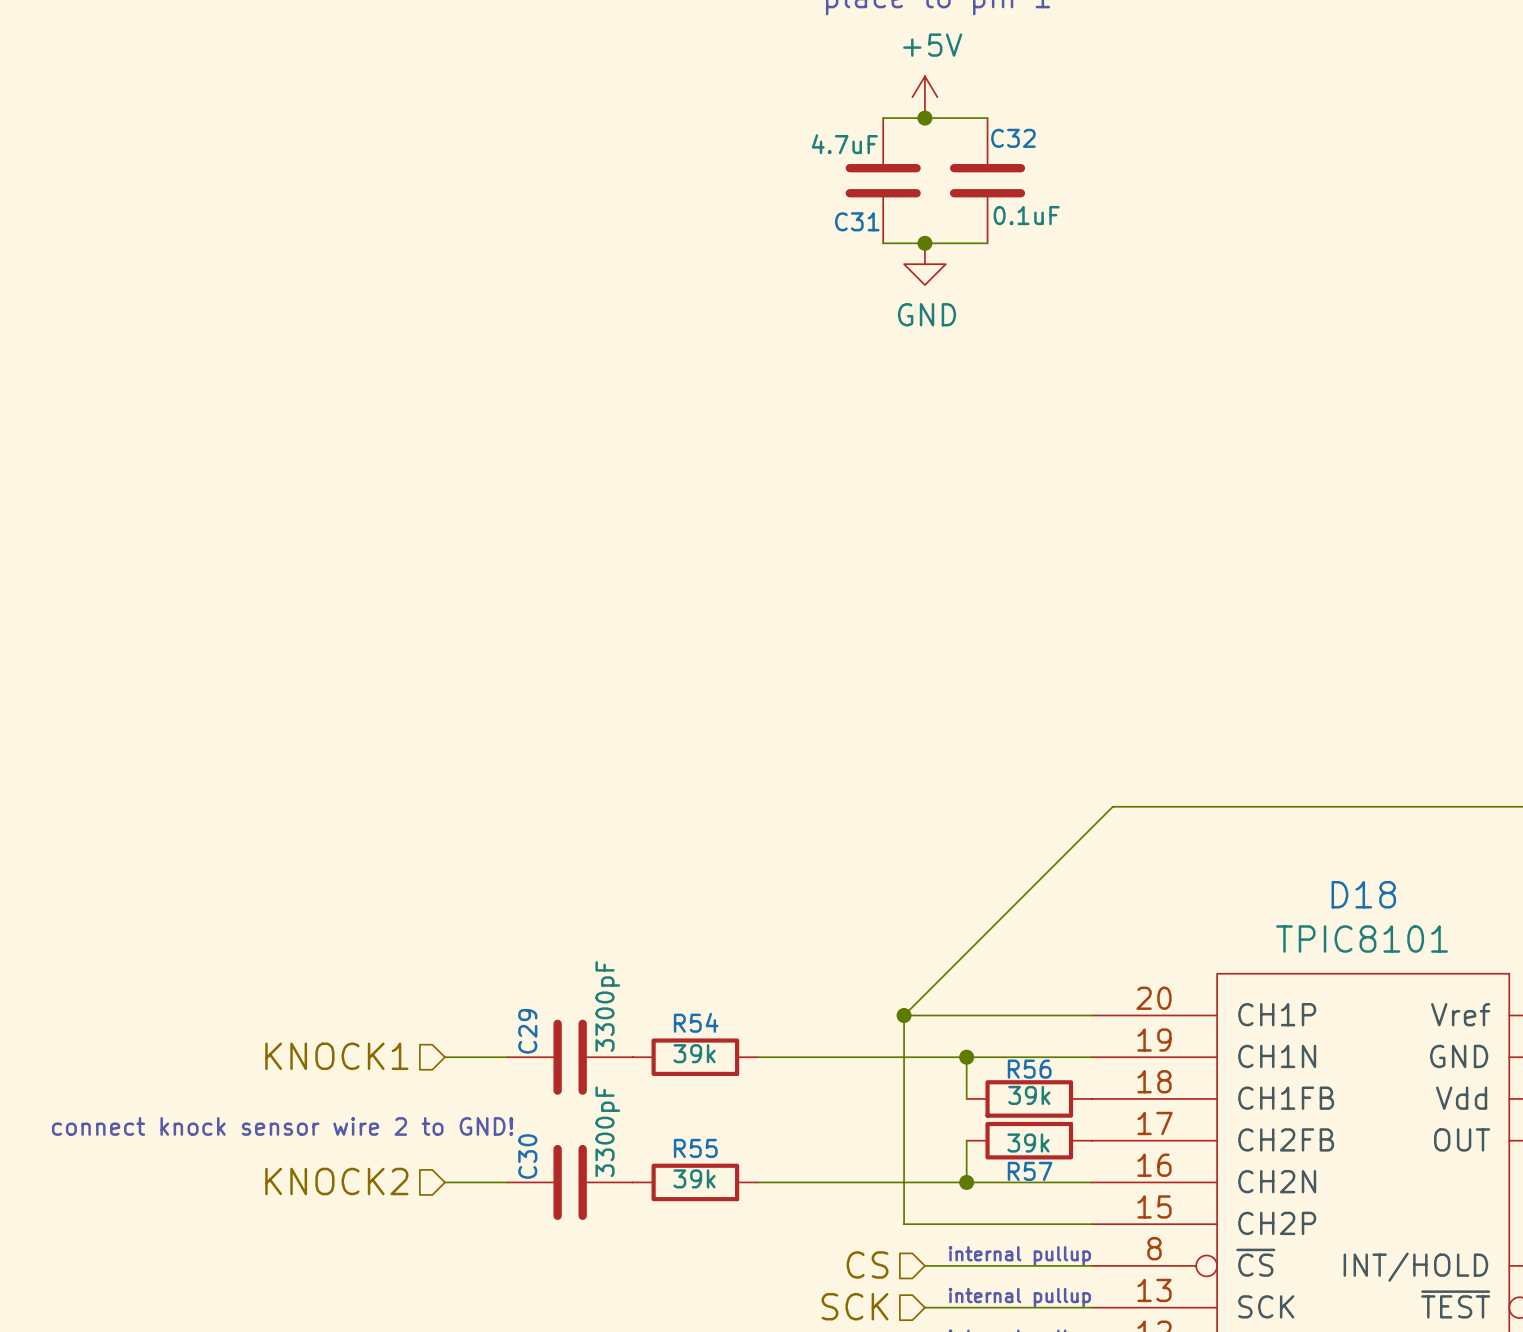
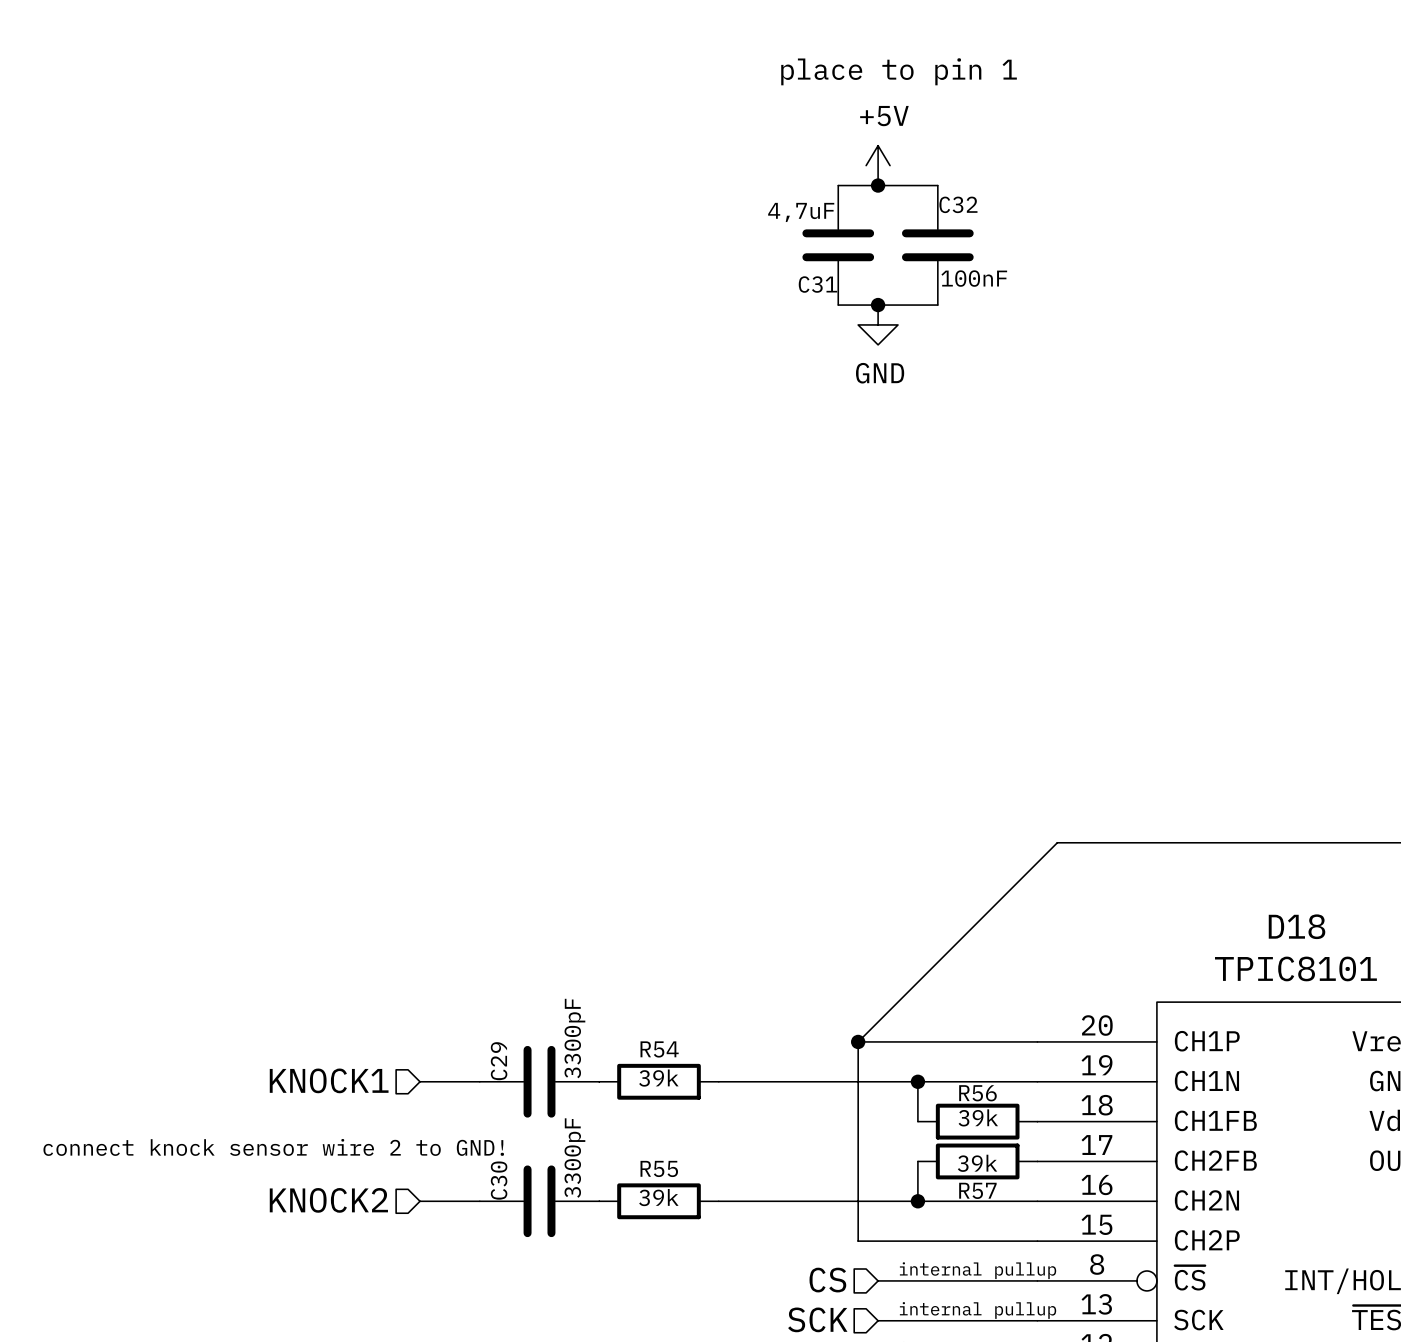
C31 value: 4.7uF (844, 144) -> 4,7uF (801, 212)
C32 value: 0.1uF (1026, 215) -> 100nF (974, 278)

